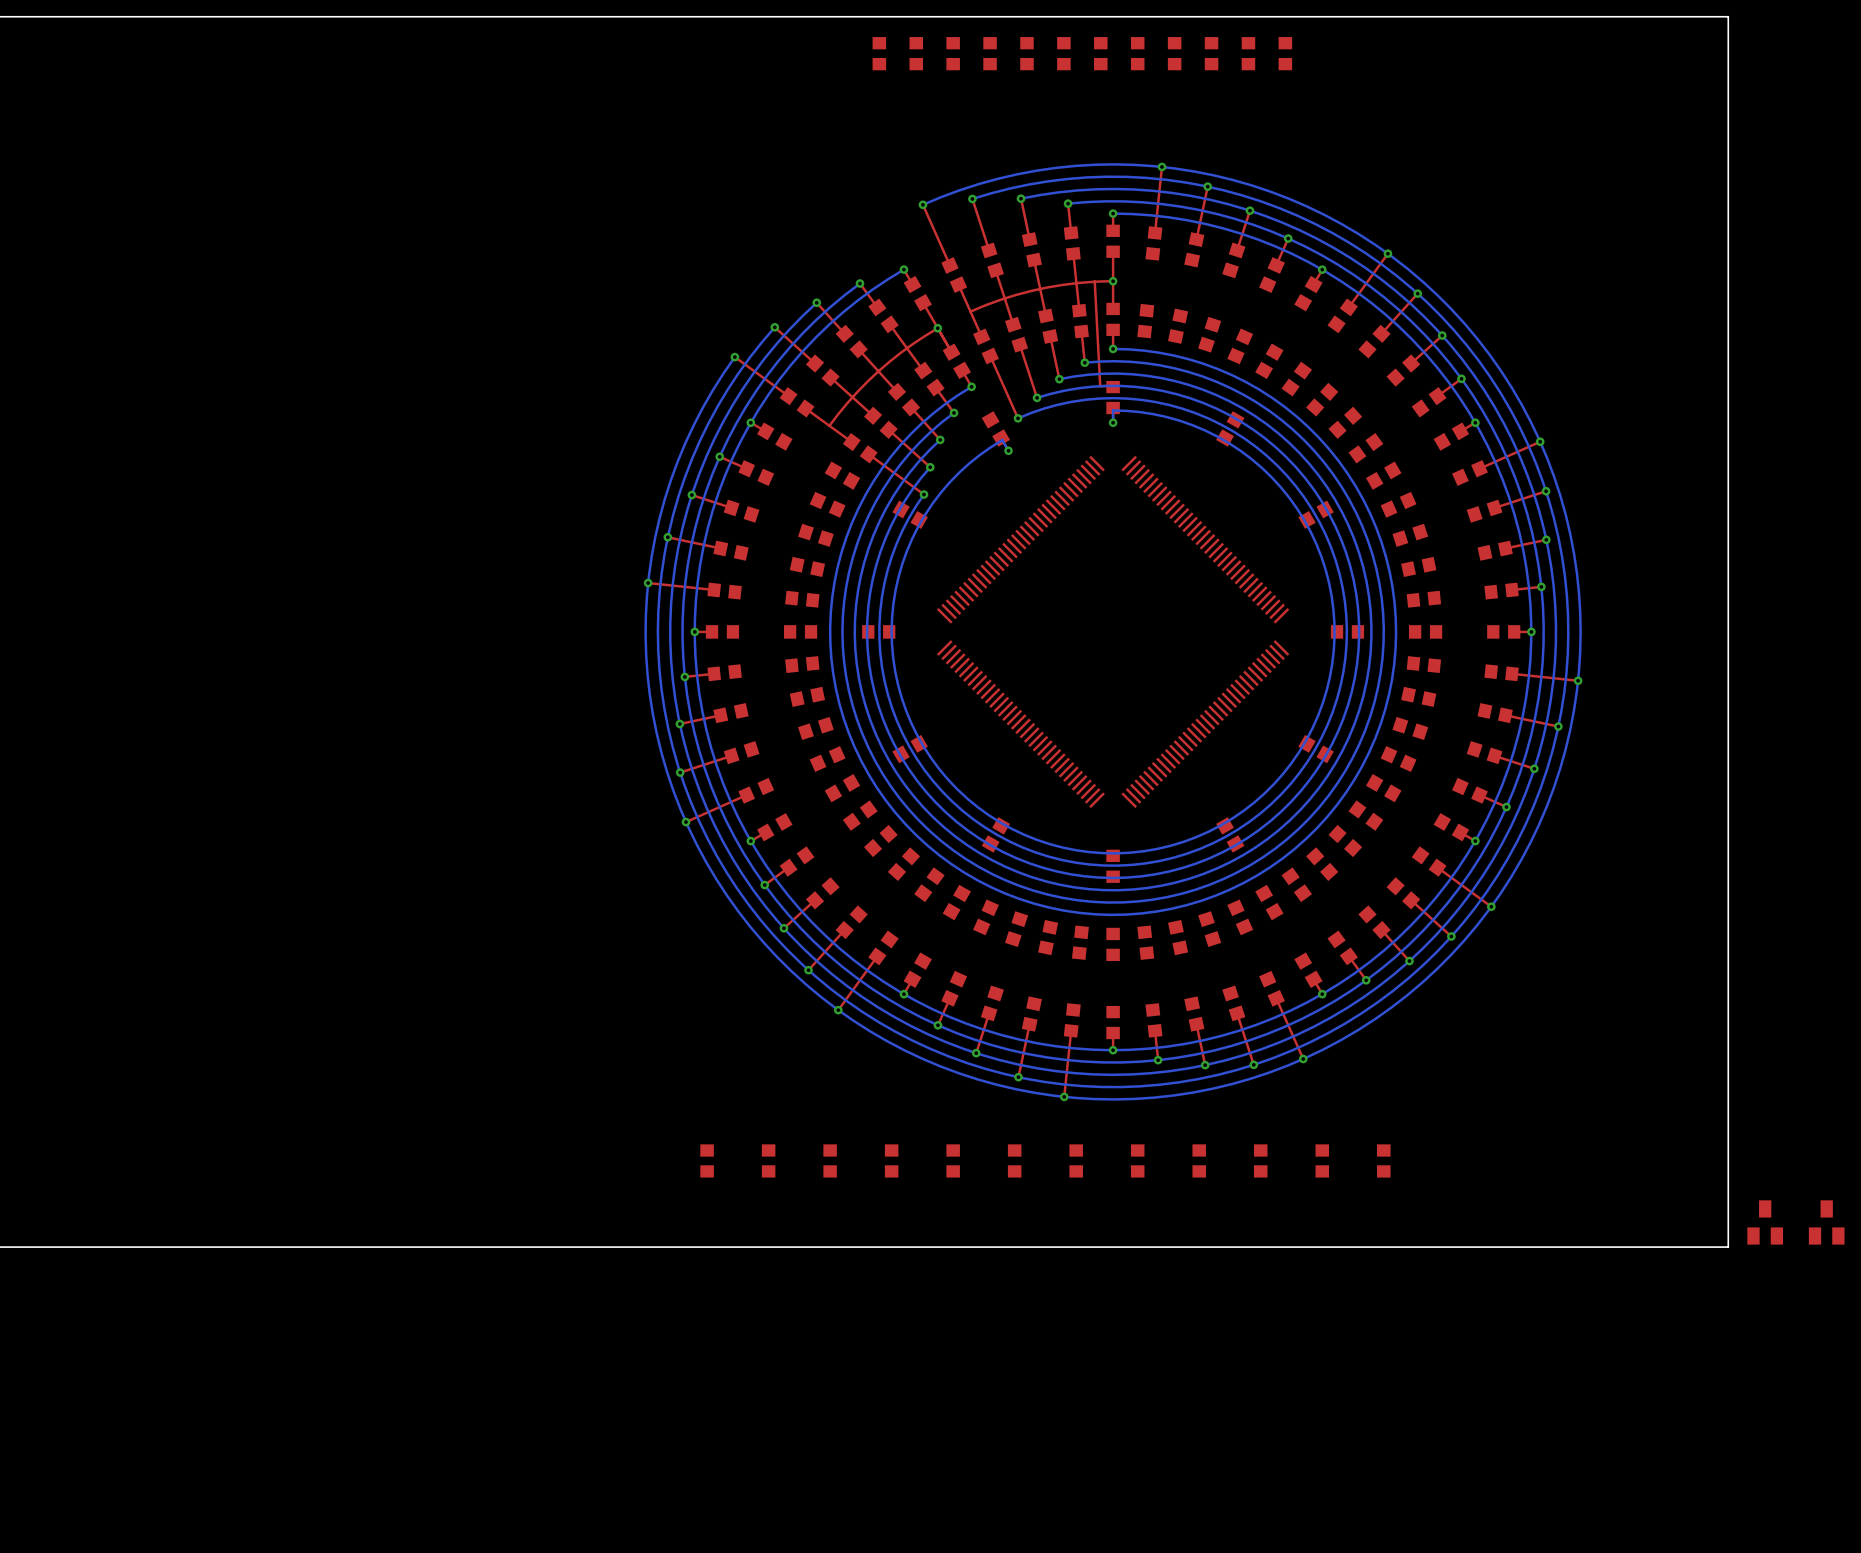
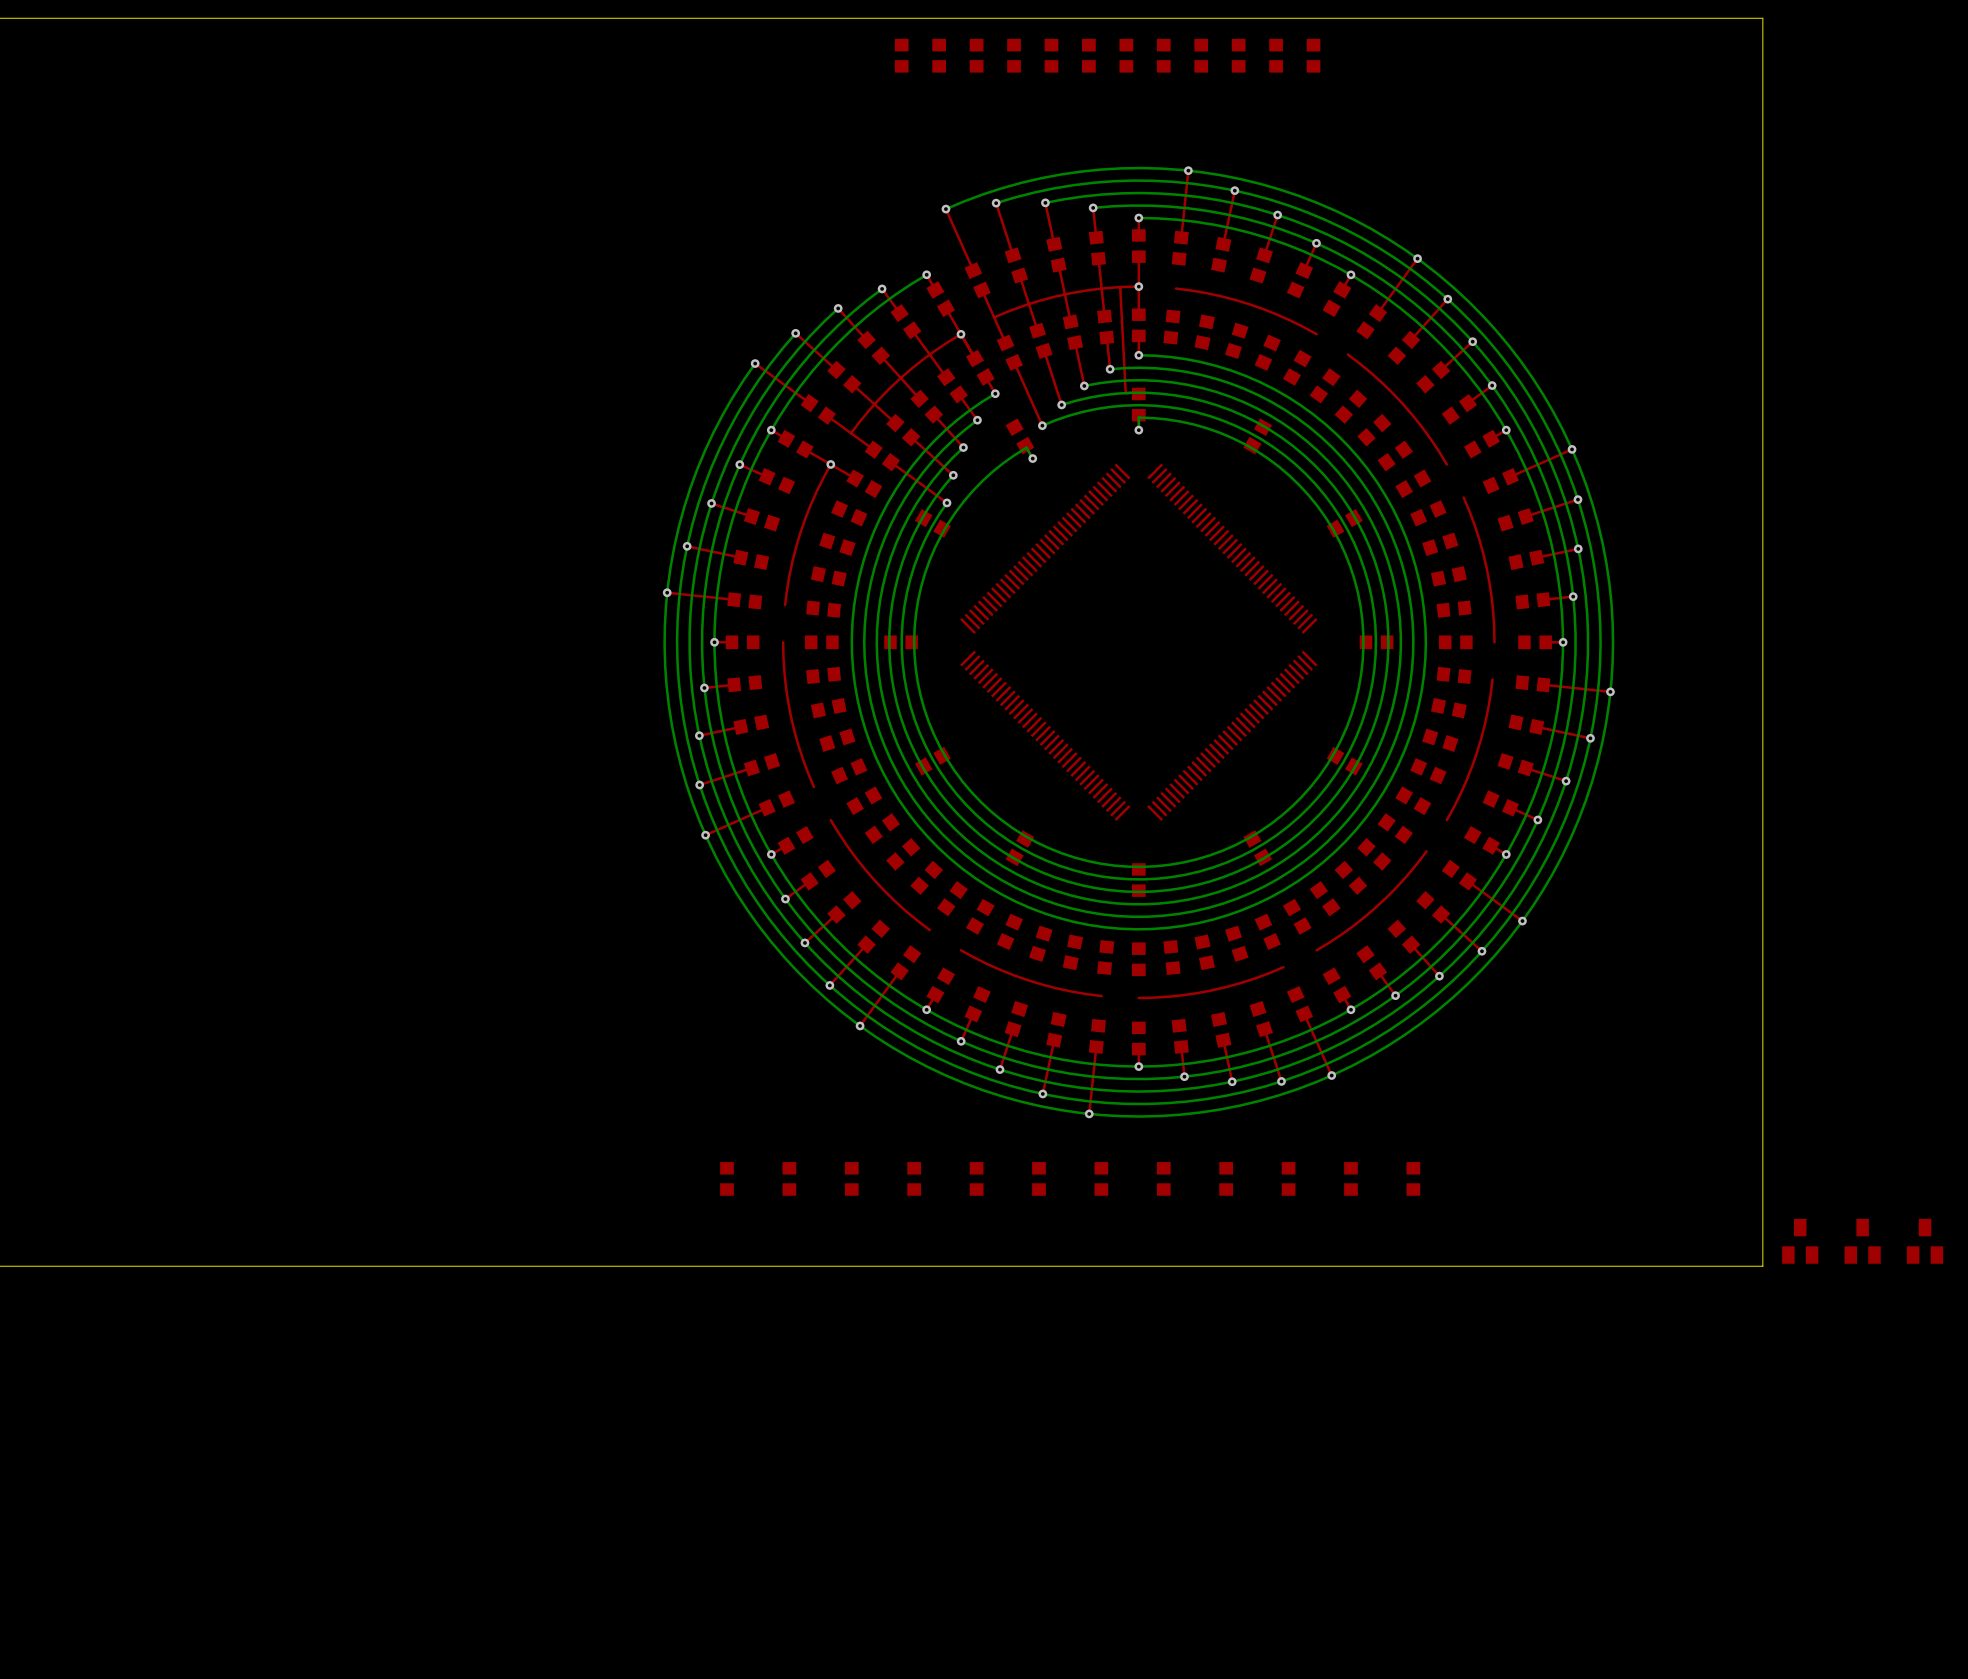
top track: none -> (1176, 288) (1205, 292) (1248, 304) (1290, 320) (1316, 334)
top track: none -> (1347, 354) (1382, 383) (1403, 404) (1422, 427) (1446, 464)
top track: none -> (804, 449) (855, 478)
top track: none -> (830, 464) (817, 490) (800, 532) (789, 575) (785, 605)
via: none -> (830, 464)
top track: none -> (1463, 497) (1479, 539) (1486, 568) (1493, 612) (1494, 642)
top track: none -> (783, 642) (784, 672) (790, 716) (798, 745) (813, 786)
top track: none -> (1492, 679) (1488, 708) (1477, 752) (1466, 780) (1446, 820)
top track: none -> (830, 820) (855, 857) (874, 880) (906, 911) (929, 930)
top track: none -> (1426, 851) (1408, 874) (1376, 906) (1353, 925) (1316, 950)
top track: none -> (960, 950) (987, 964) (1028, 980) (1072, 991) (1101, 996)
top track: none -> (1283, 967) (1241, 982) (1212, 990) (1183, 995) (1138, 997)

